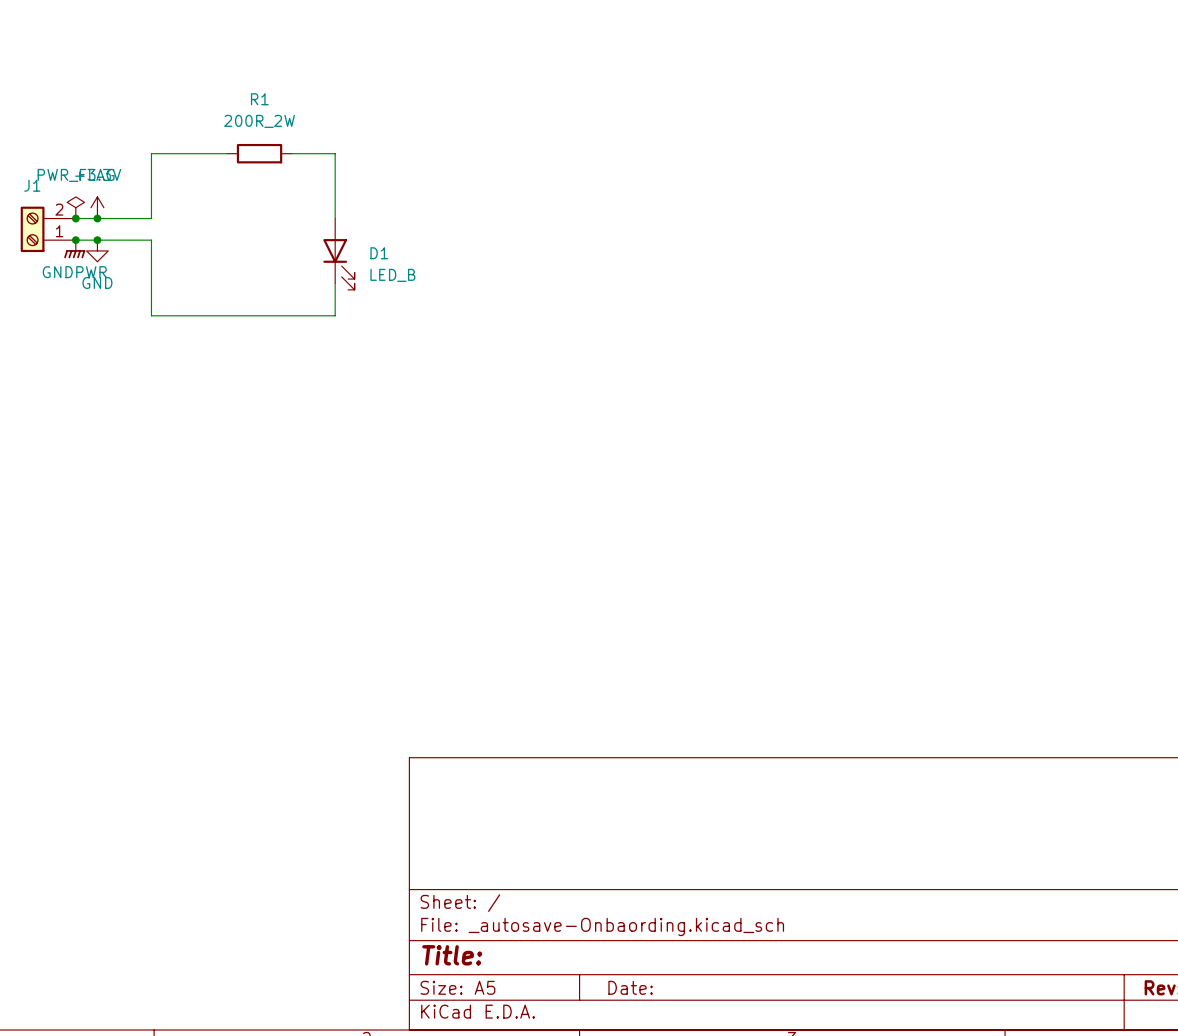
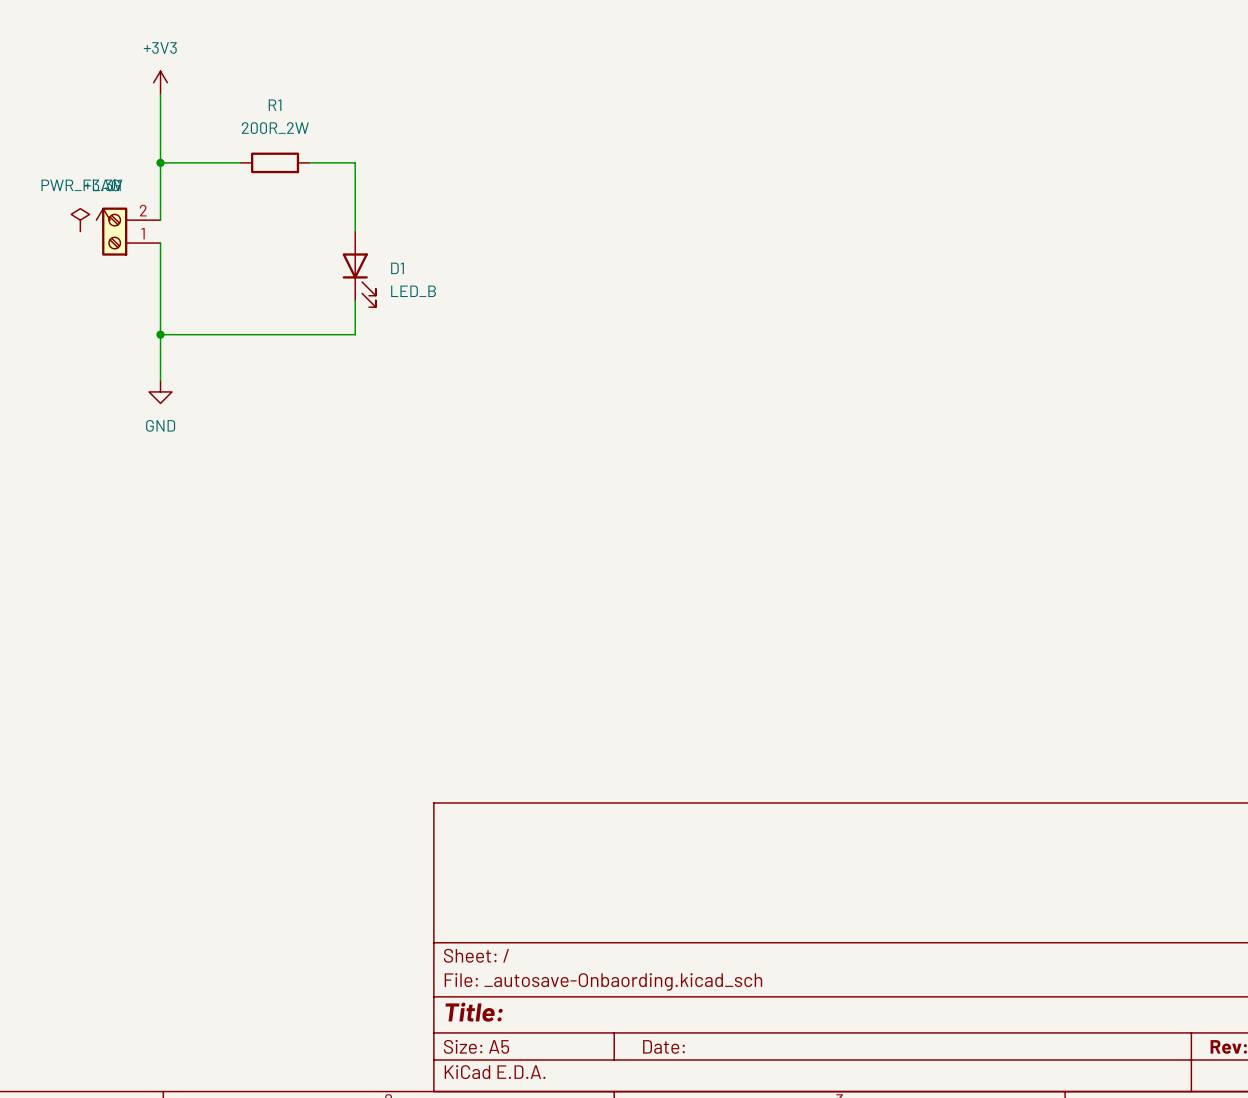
power symbol: none -> +3V3 (160, 82)
wire: none -> (160, 94) (160, 162)
junction: none -> (160, 162)
wire: (151, 207) (151, 218) (75, 218) -> none
junction: (75, 218) -> none
junction: (97, 218) -> none
J1 position: (48, 229) -> (131, 231)
wire: (75, 240) (151, 240) -> (160, 243) (160, 254)
junction: (75, 240) -> none
junction: (97, 240) -> none
power symbol: GNDPWR (74, 249) -> none
power symbol position: GND (97, 250) -> GND (160, 391)
wire: none -> (160, 334) (160, 380)
junction: none -> (160, 334)

